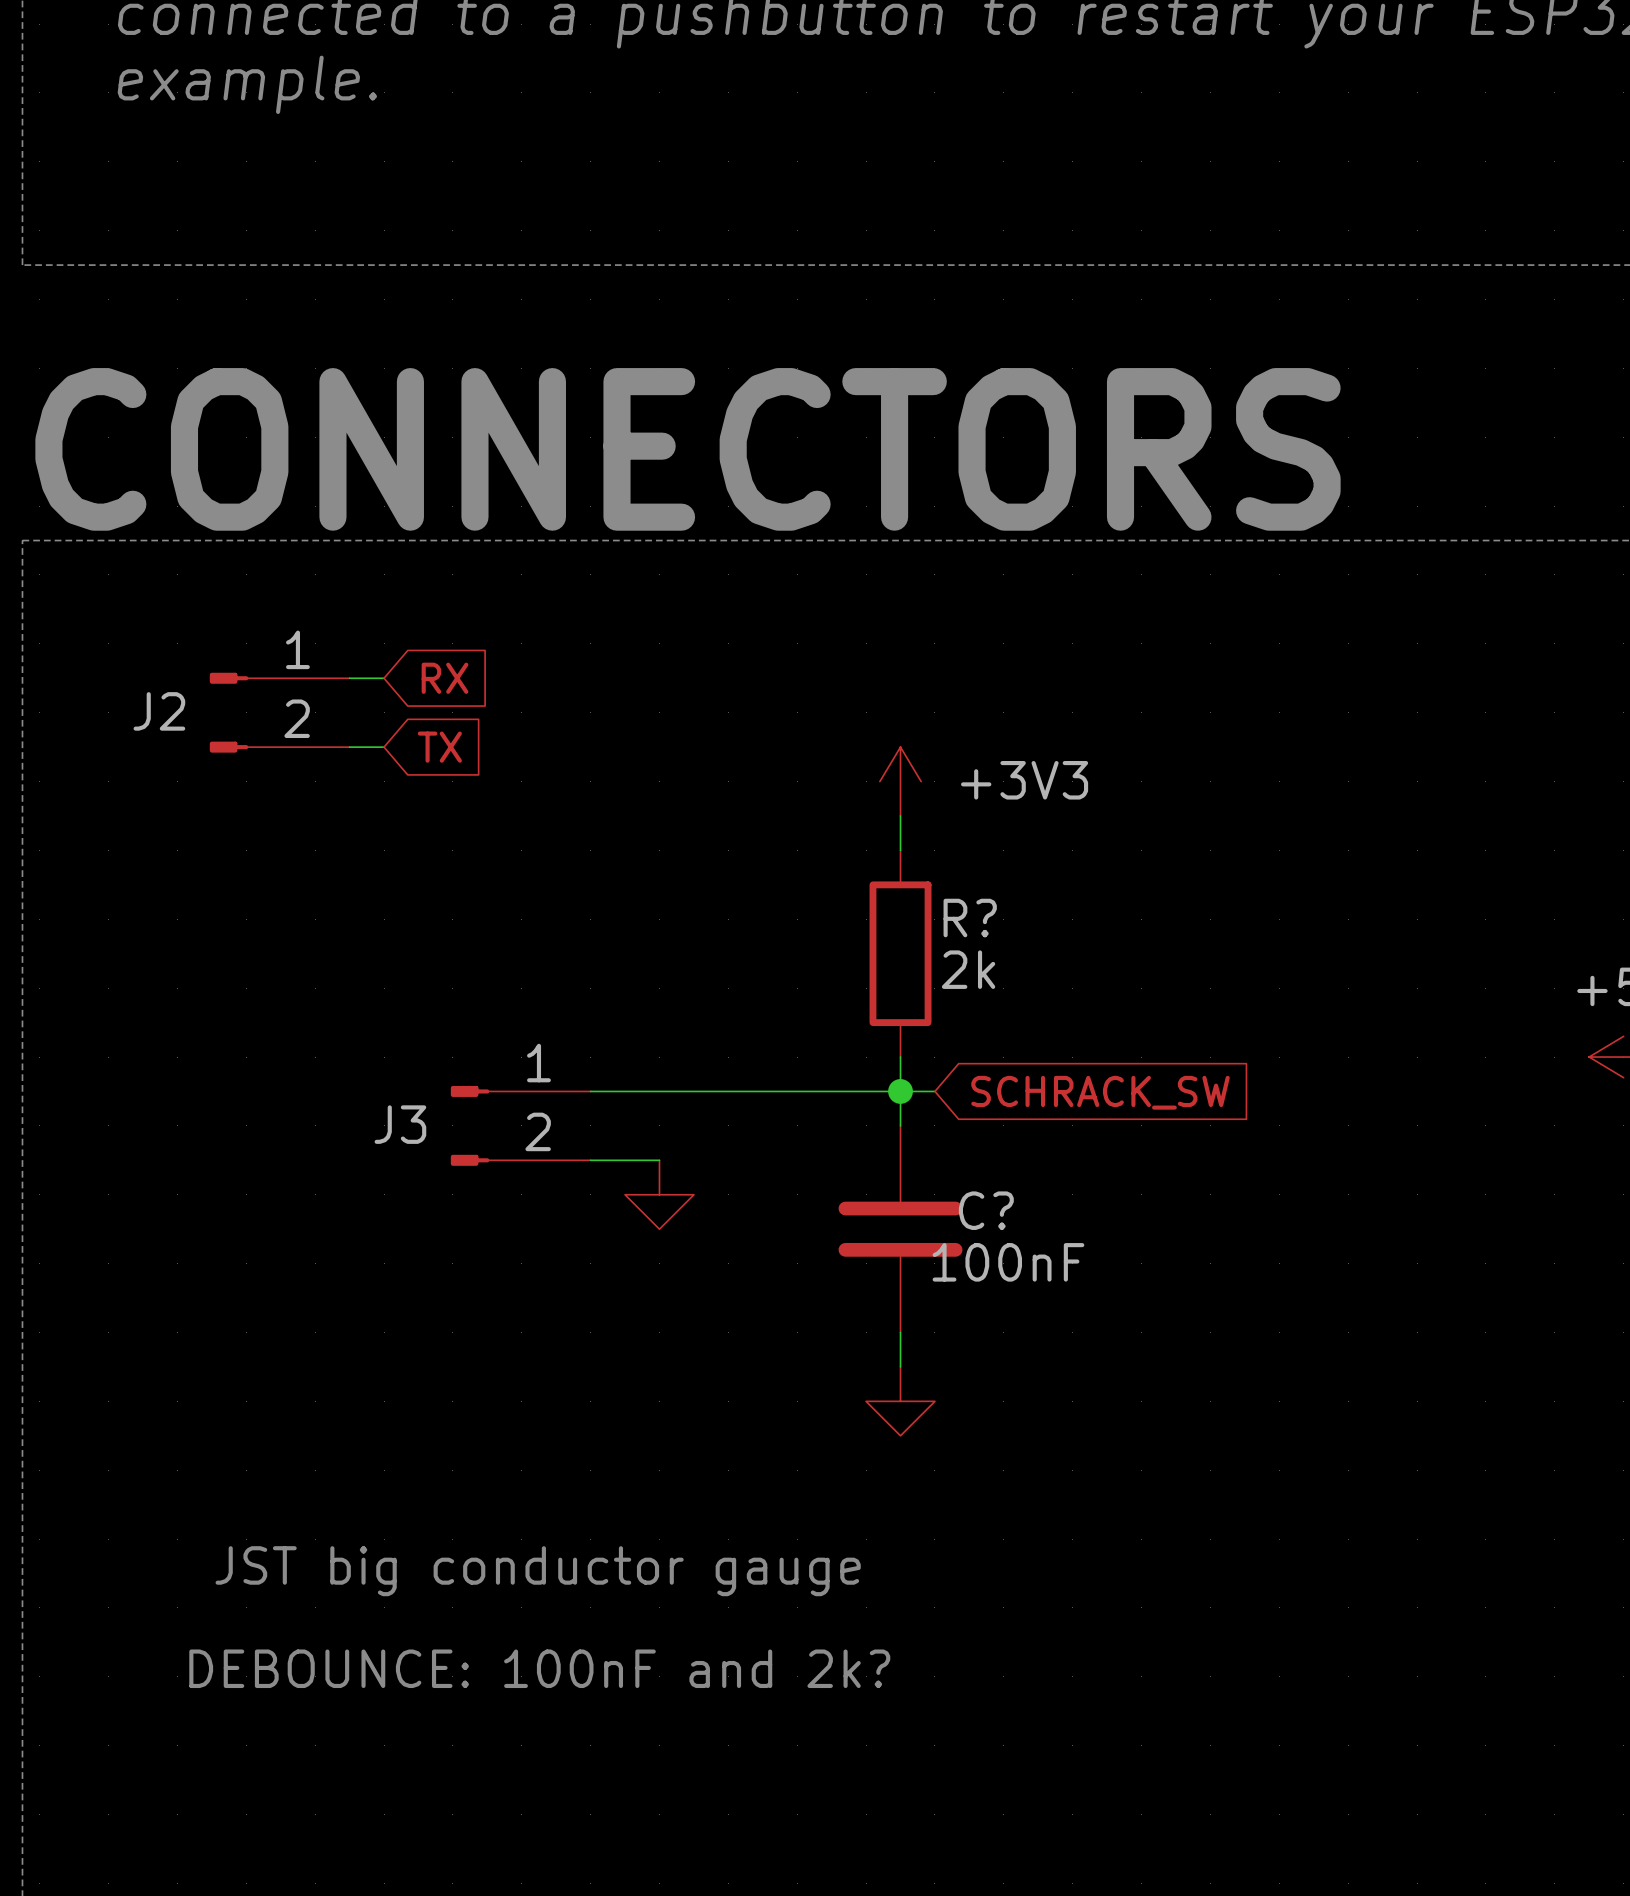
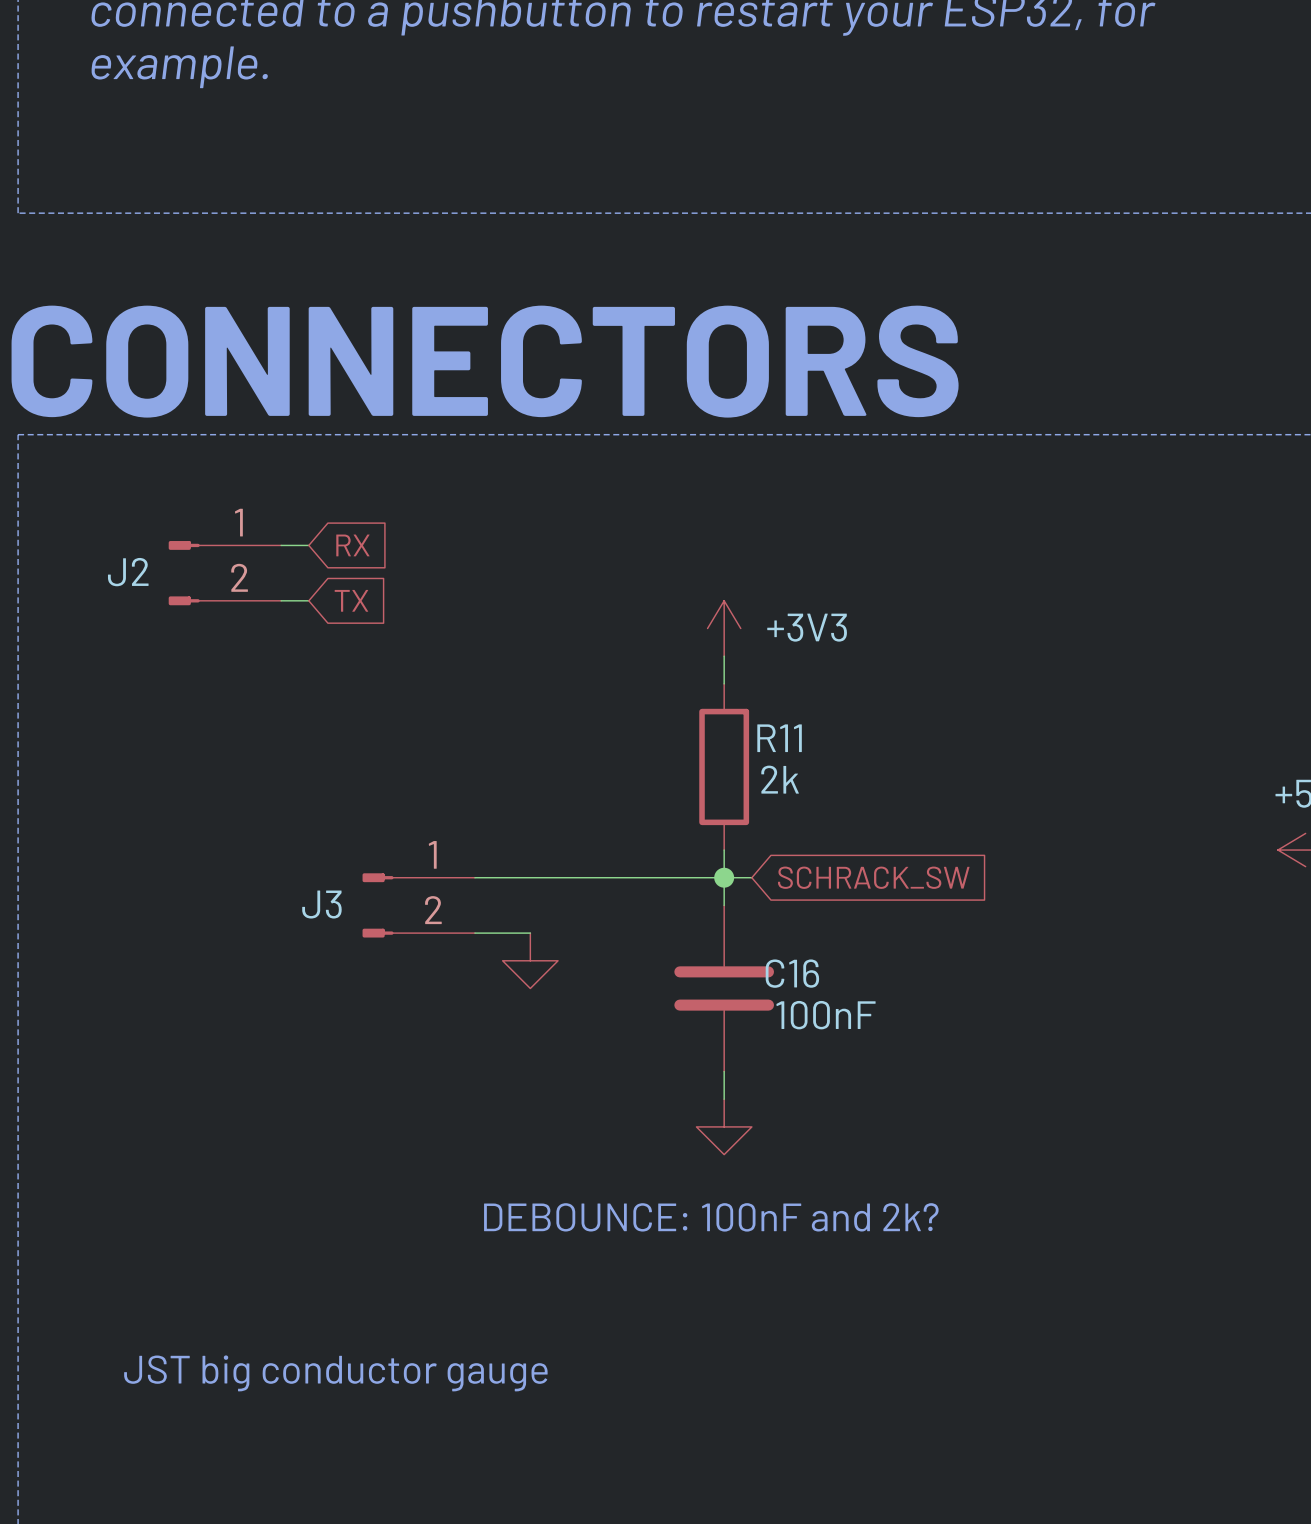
R? name: R? (970, 918) -> R11 (779, 738)
C? name: C? (986, 1210) -> C16 (792, 973)
text position: JST big conductor gauge (538, 1571) -> JST big conductor gauge (335, 1373)
text position: DEBOUNCE: 100nF and 2k? (539, 1668) -> DEBOUNCE: 100nF and 2k? (711, 1217)

